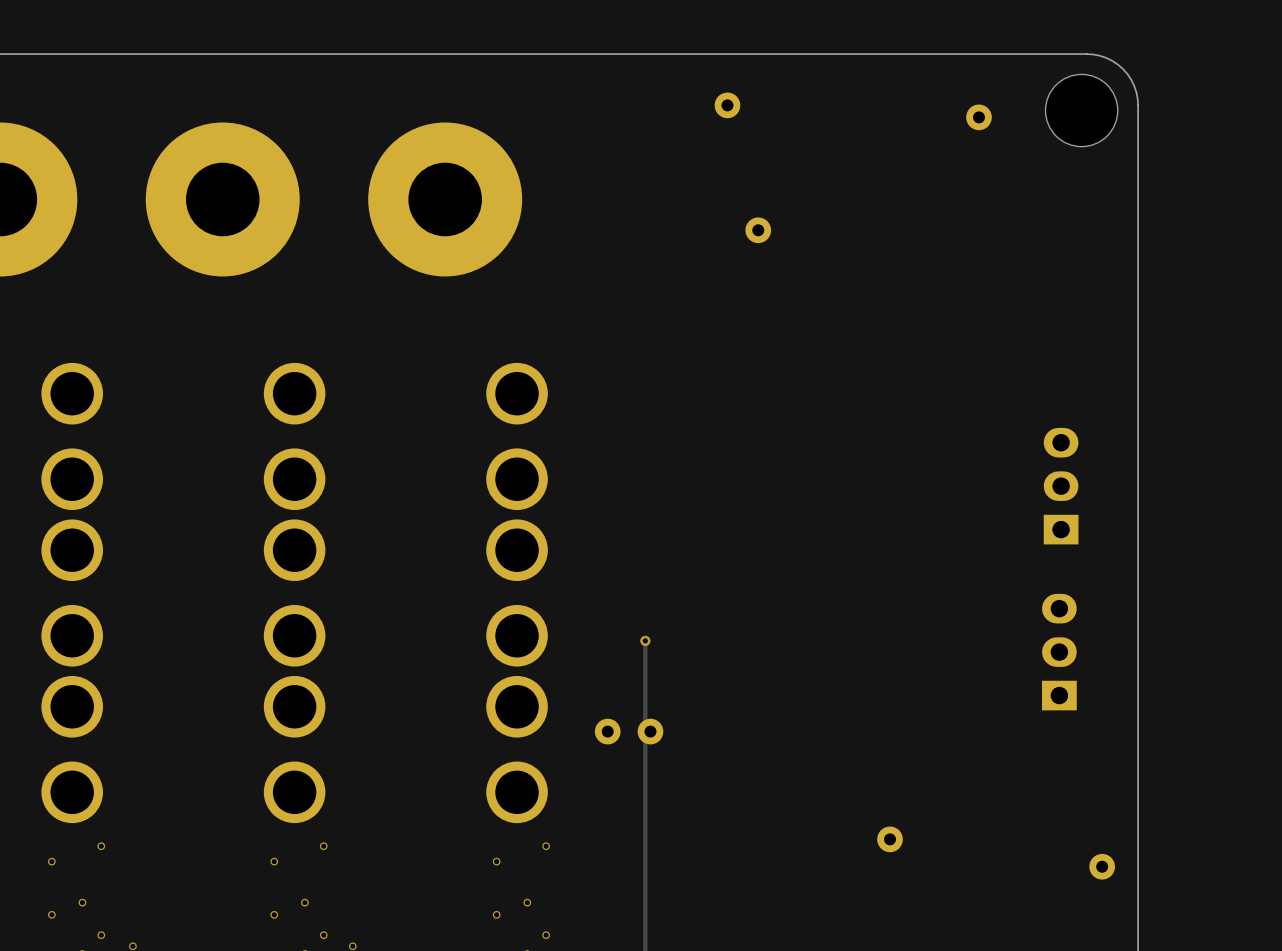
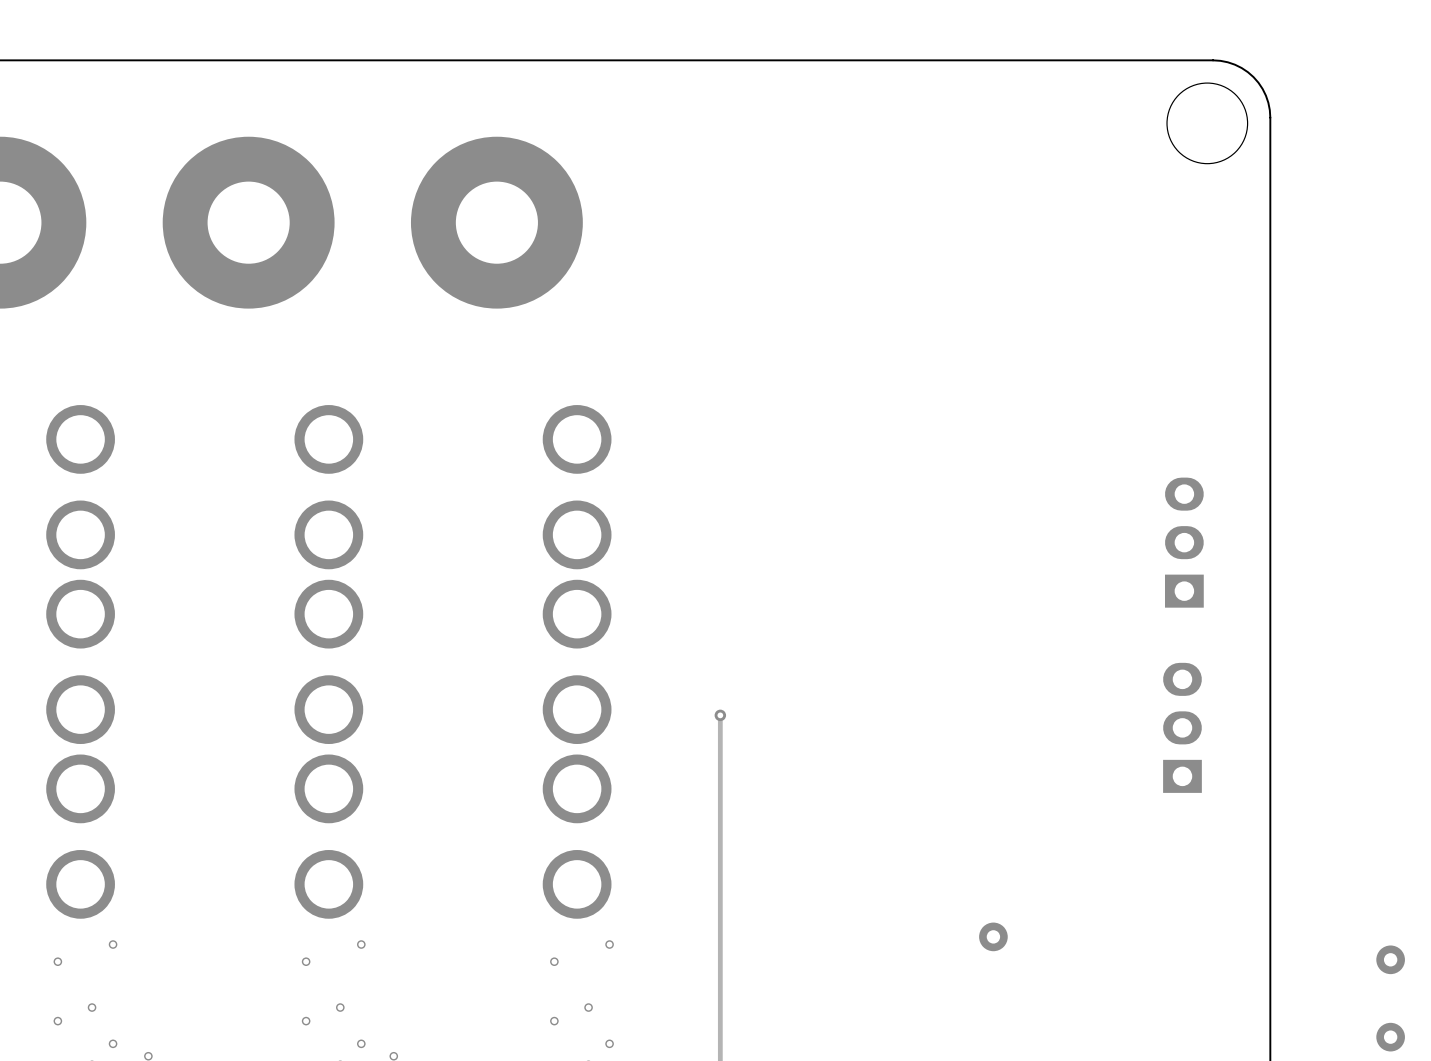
part: (727, 105) -> none
part: (978, 117) -> none
part: (758, 230) -> none
part: (607, 731) -> none
part: (650, 731) -> none
part: none -> (1390, 959)
part: (1102, 866) -> none
part: none -> (1390, 1037)

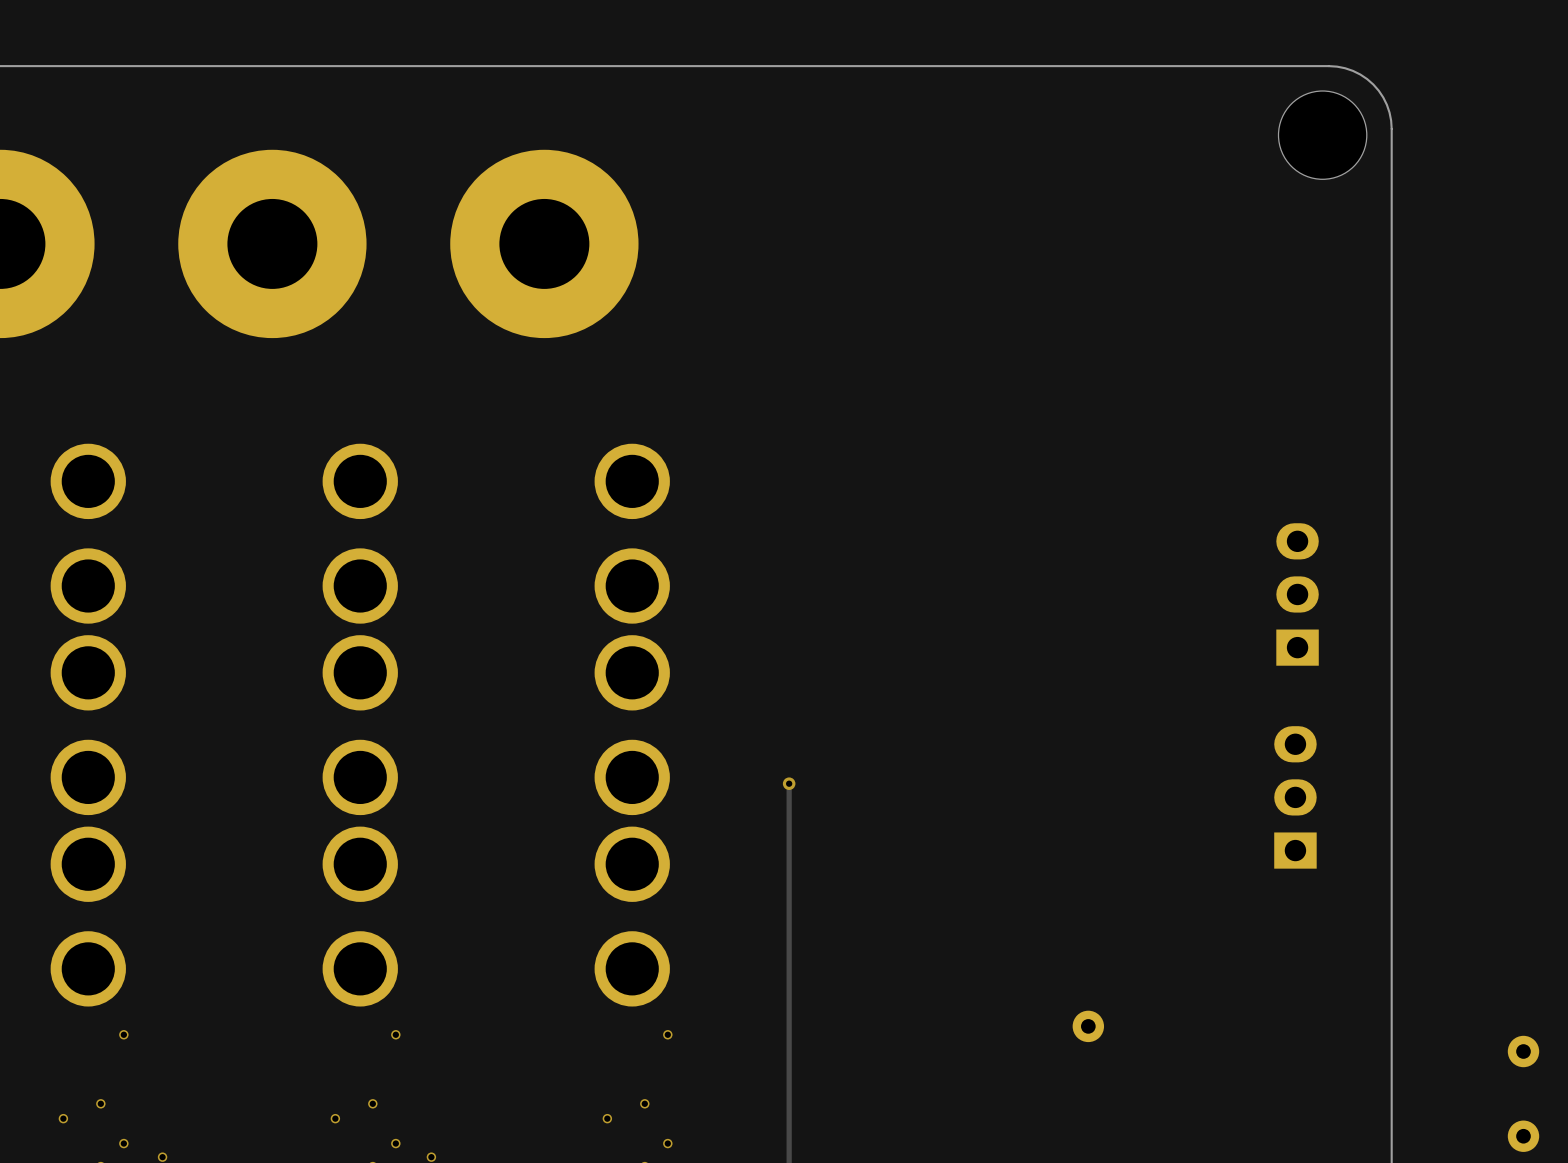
via: (57, 961) -> none
via: (306, 961) -> none
via: (554, 961) -> none

